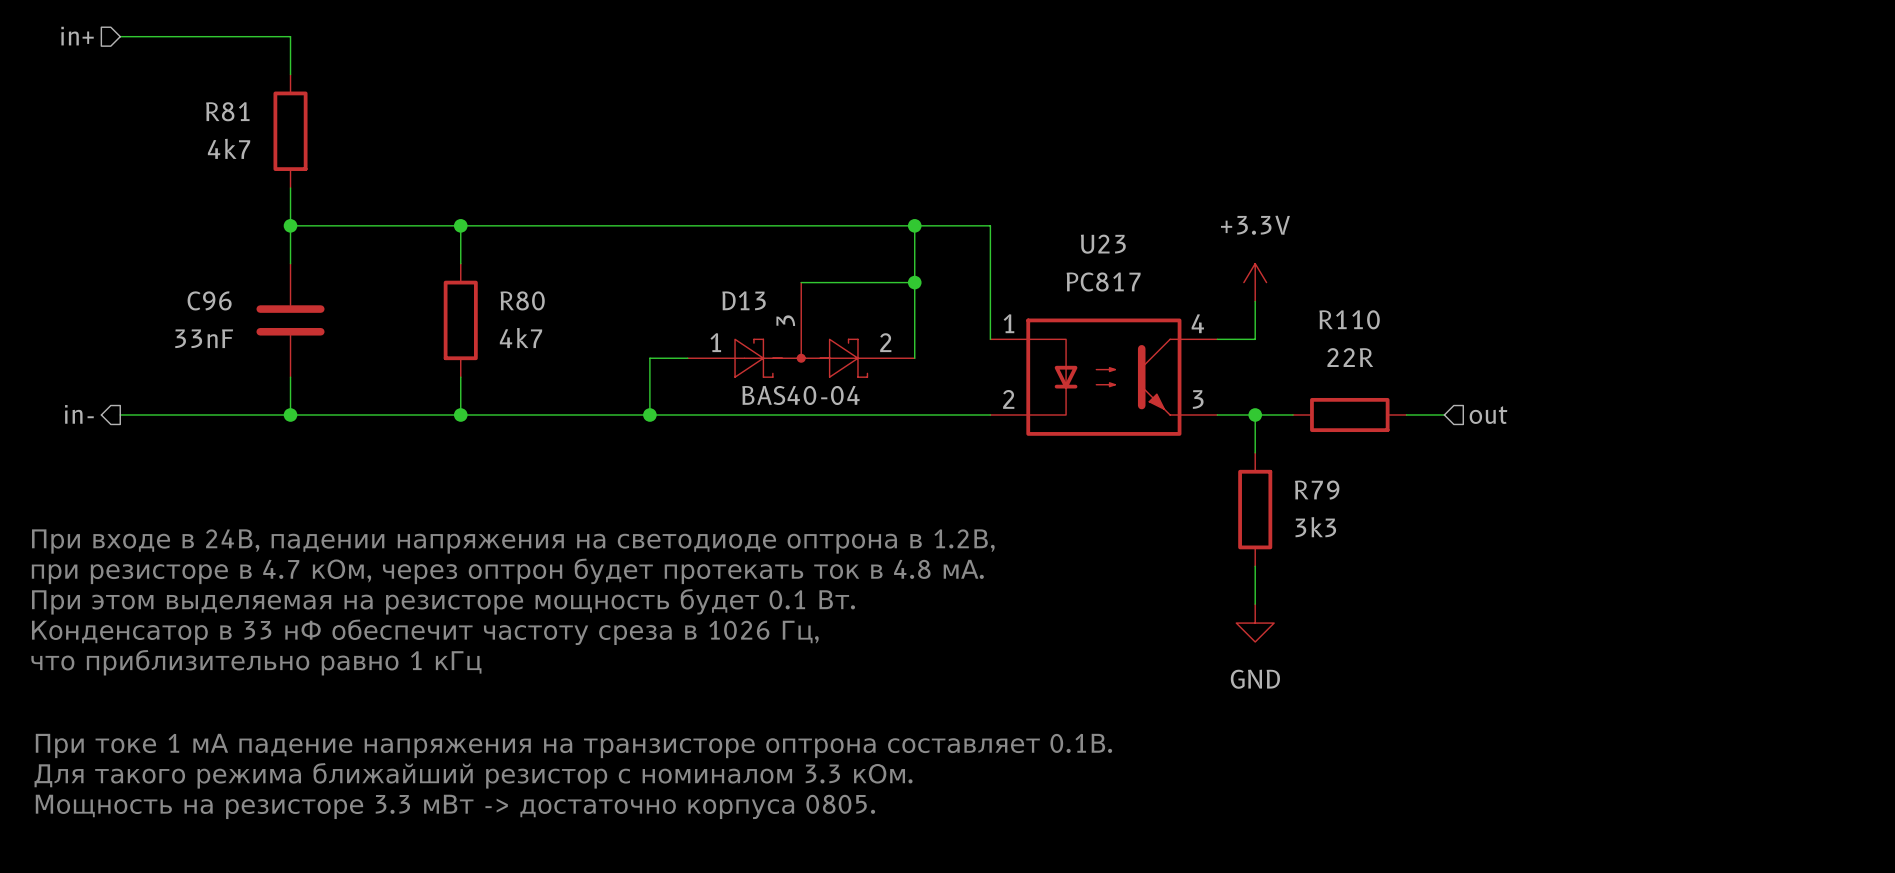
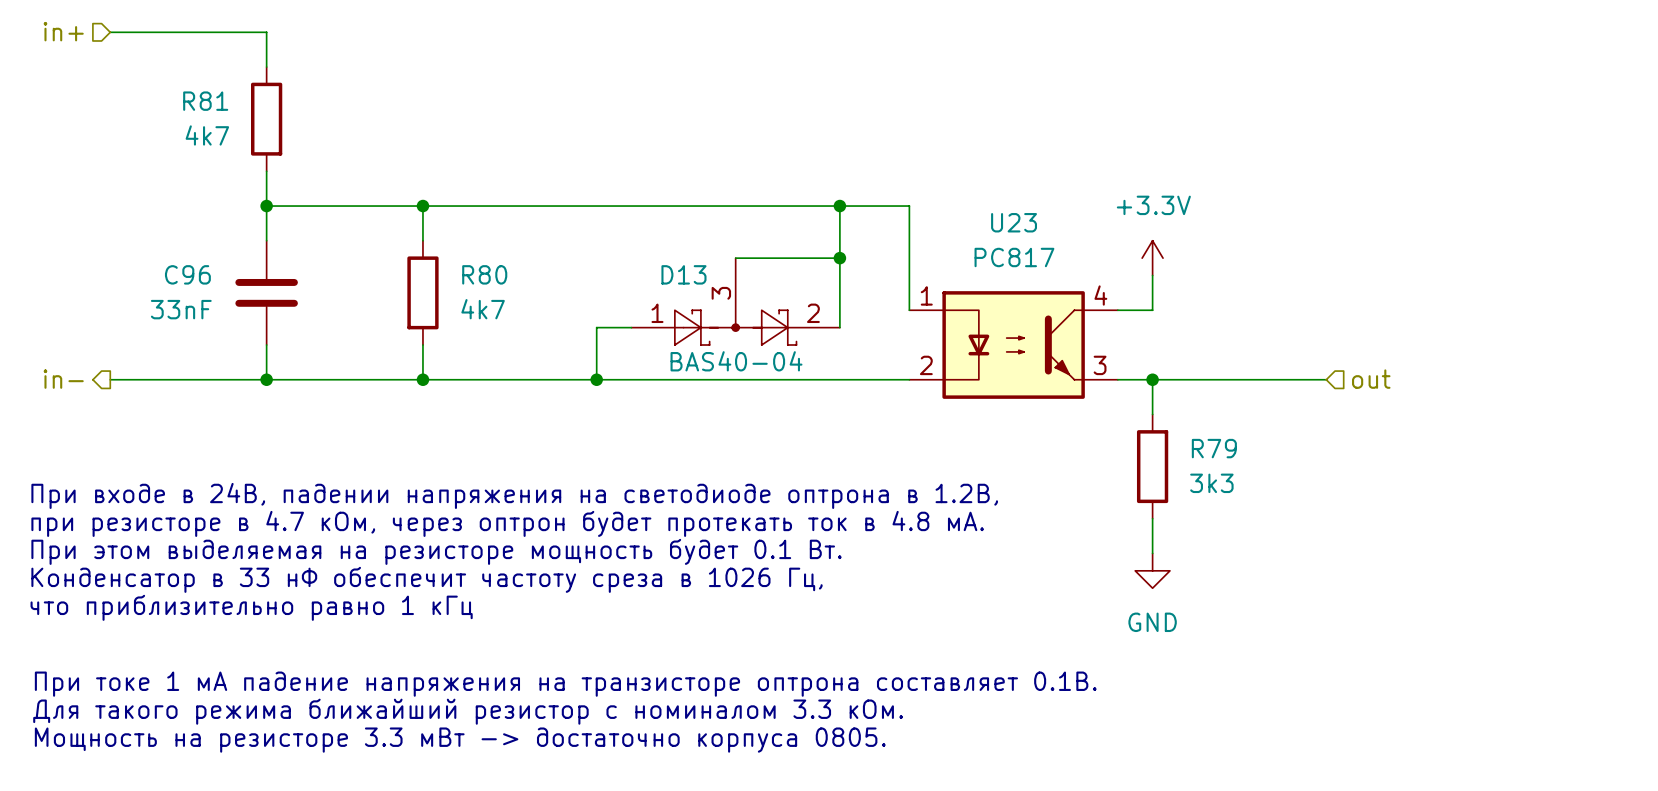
wire: none -> (1187, 379) (1291, 379)
R110: 22R (1349, 414) -> none

